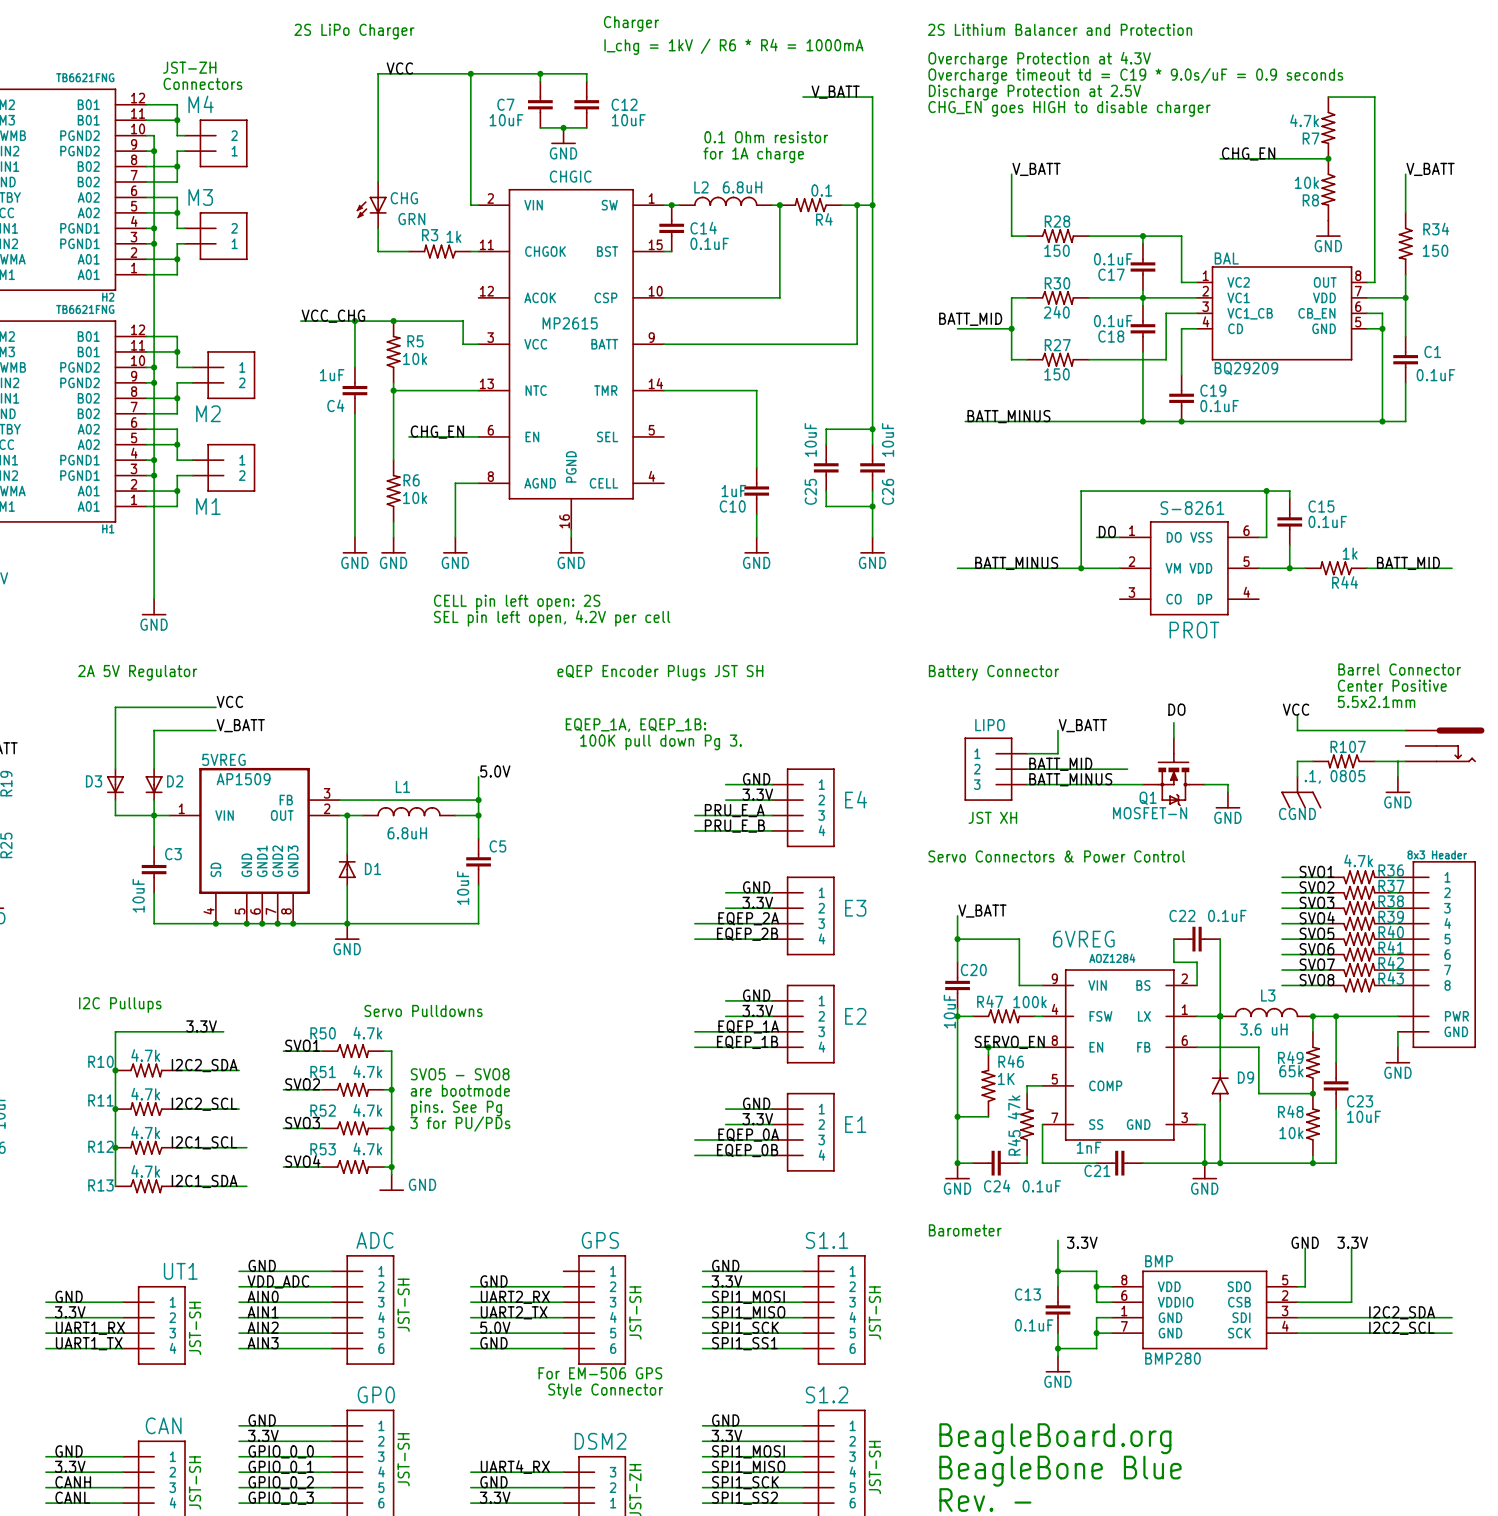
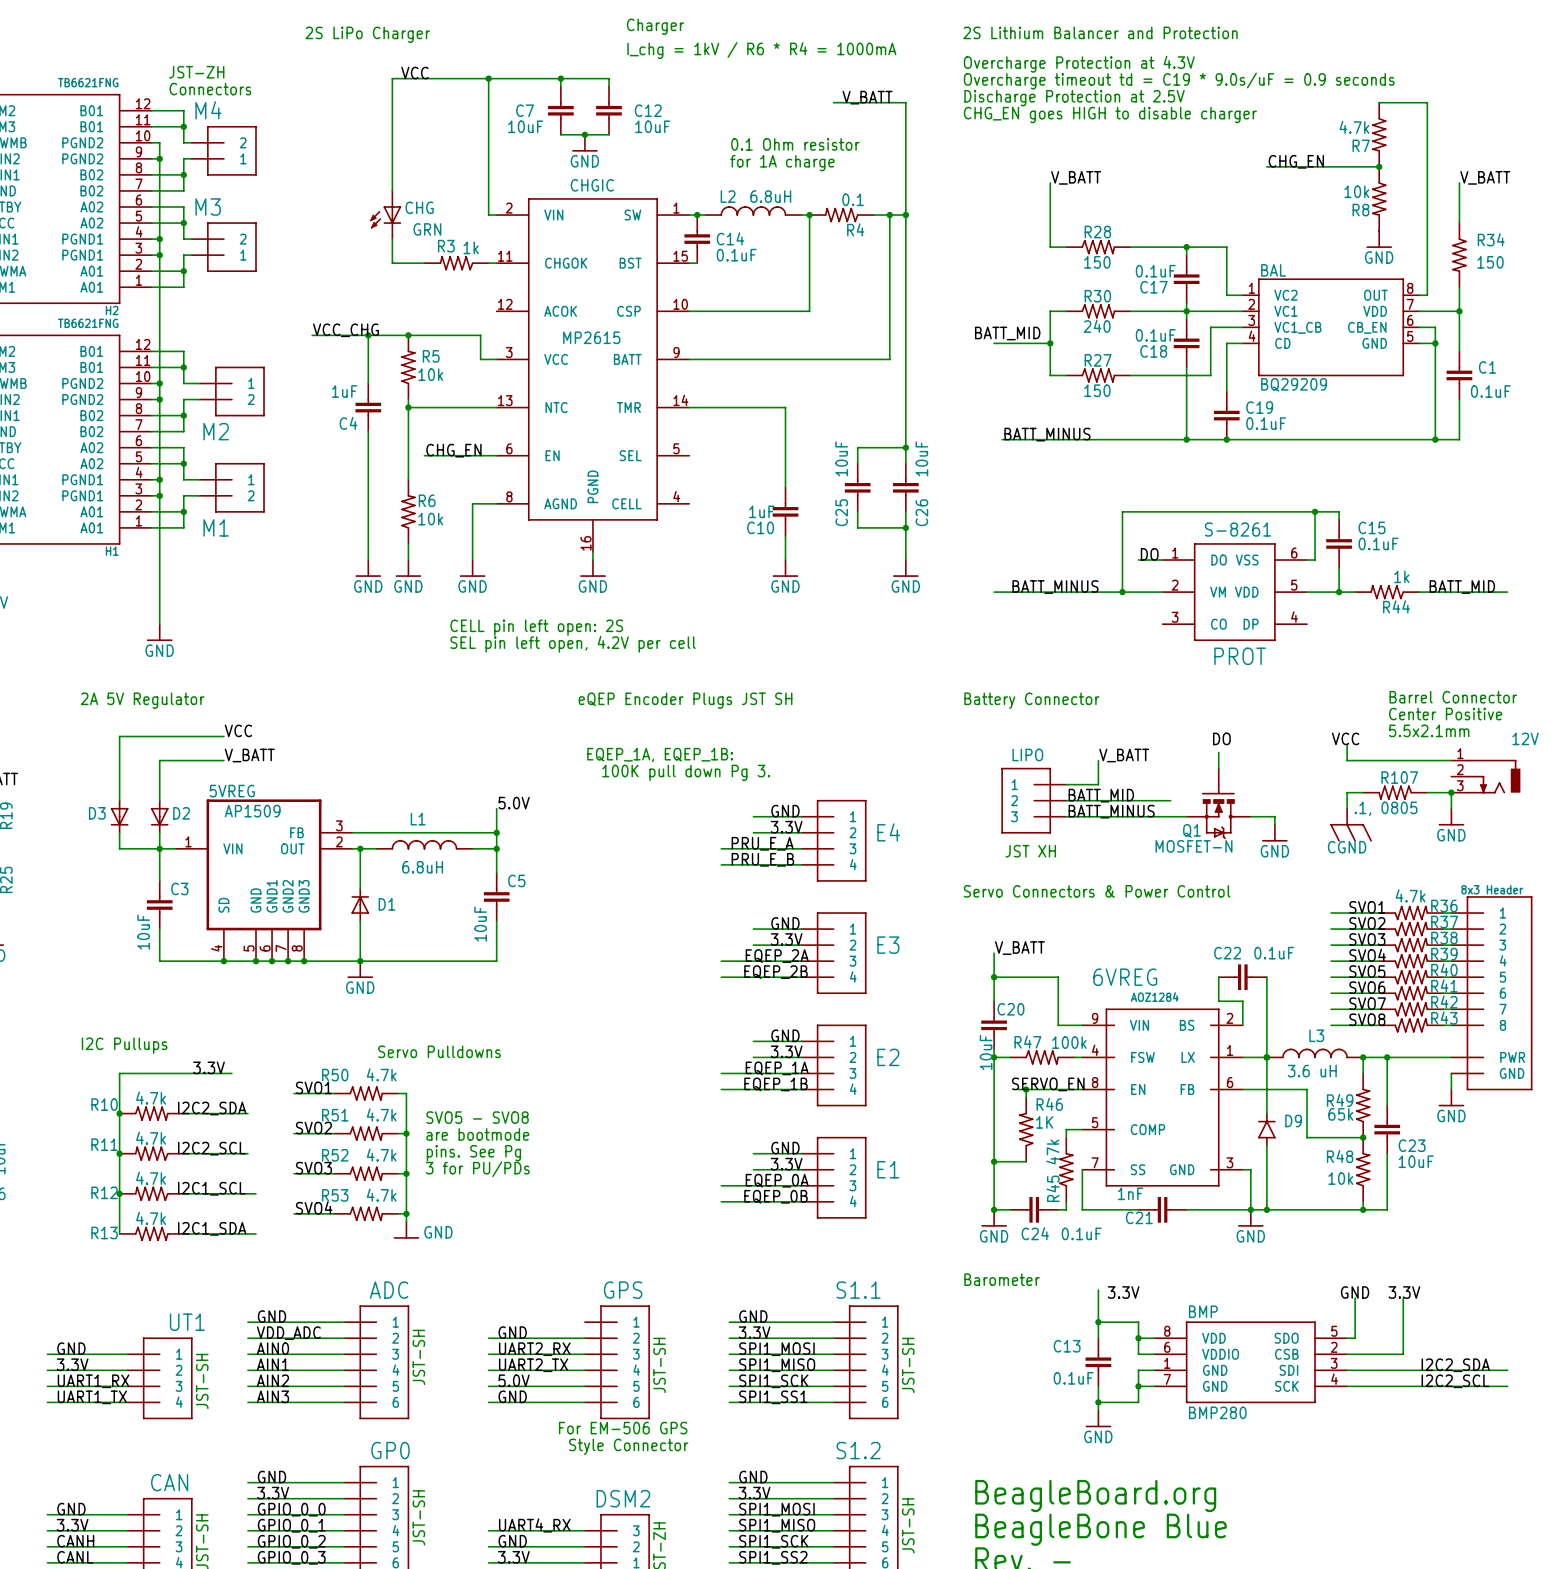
part: (1445, 744) -> none
12V: none -> (1485, 776)
junction: none -> (1451, 792)

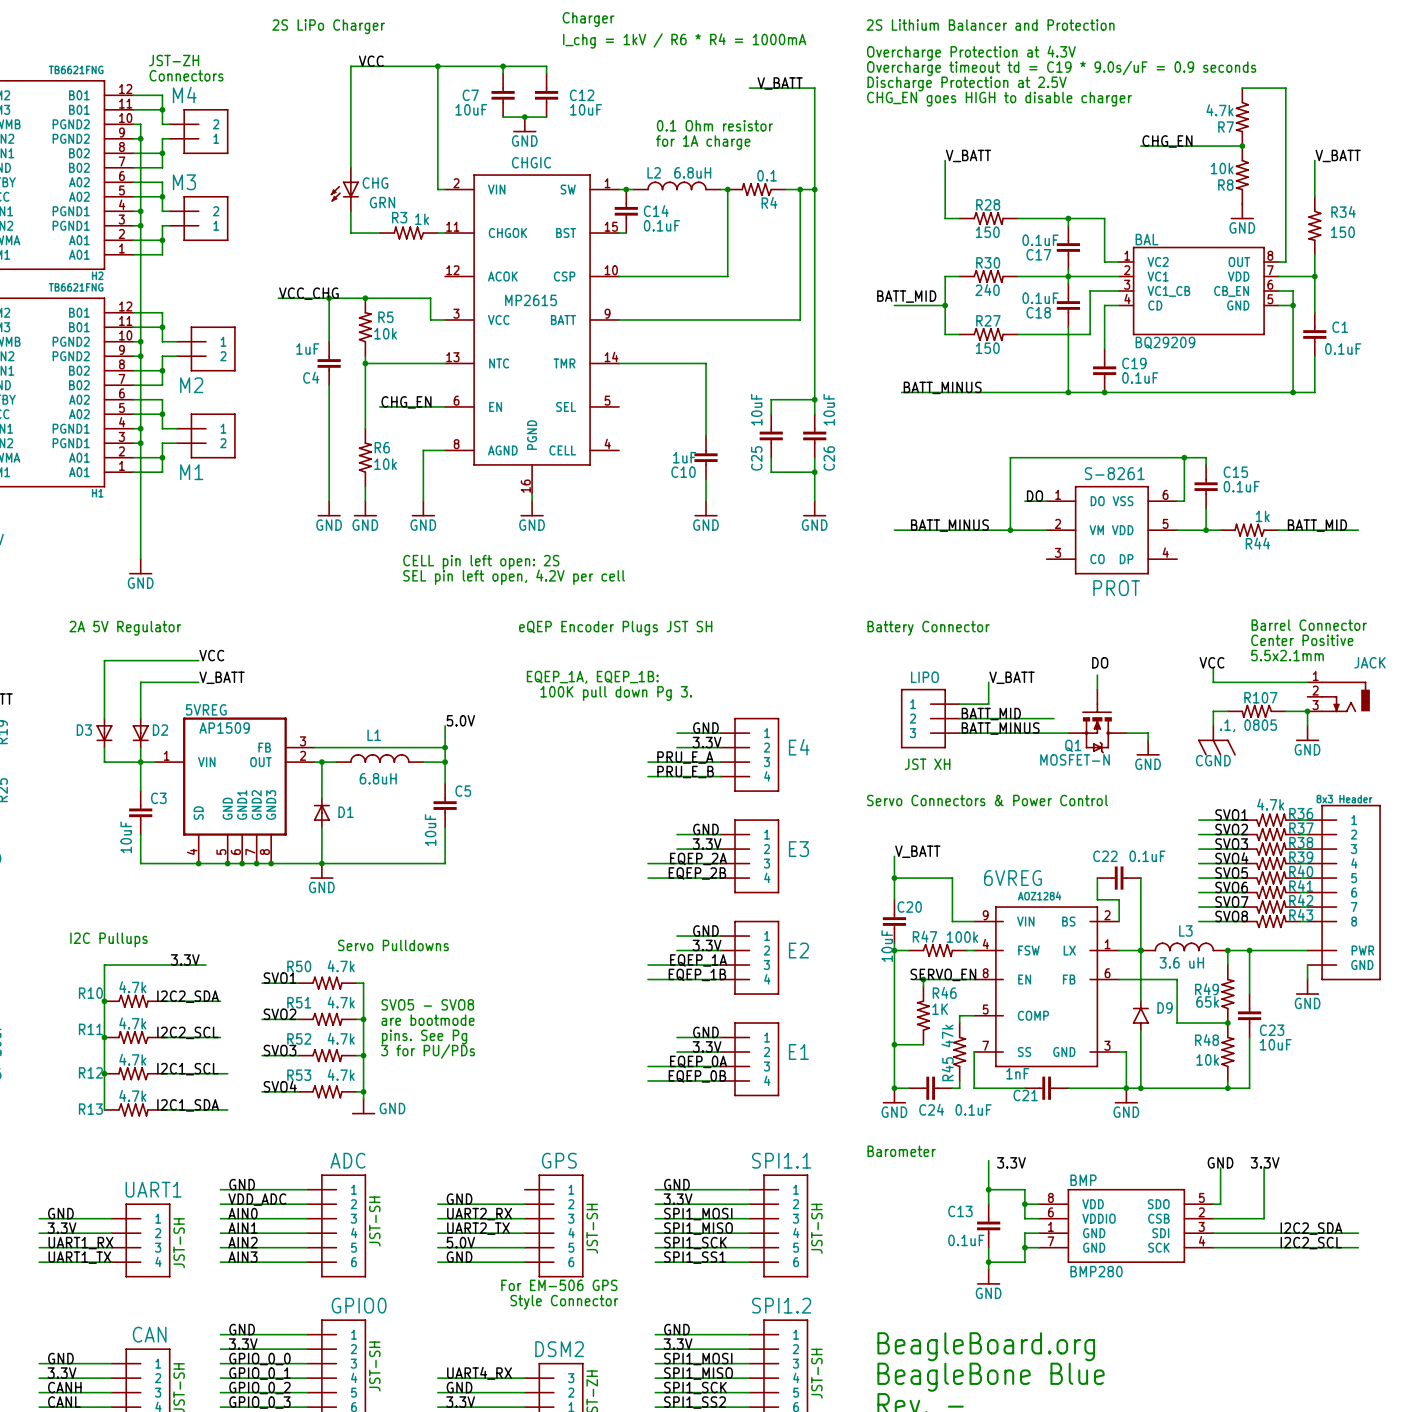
12V name: 12V (1525, 738) -> JACK (1370, 662)
S1.1 name: S1.1 (858, 1290) -> SPI1.1 (781, 1160)
UT1 name: UT1 (187, 1322) -> UART1 (153, 1189)
GP0 name: GP0 (390, 1450) -> GPIO0 (359, 1305)
S1.2 name: S1.2 (858, 1450) -> SPI1.2 (781, 1305)

